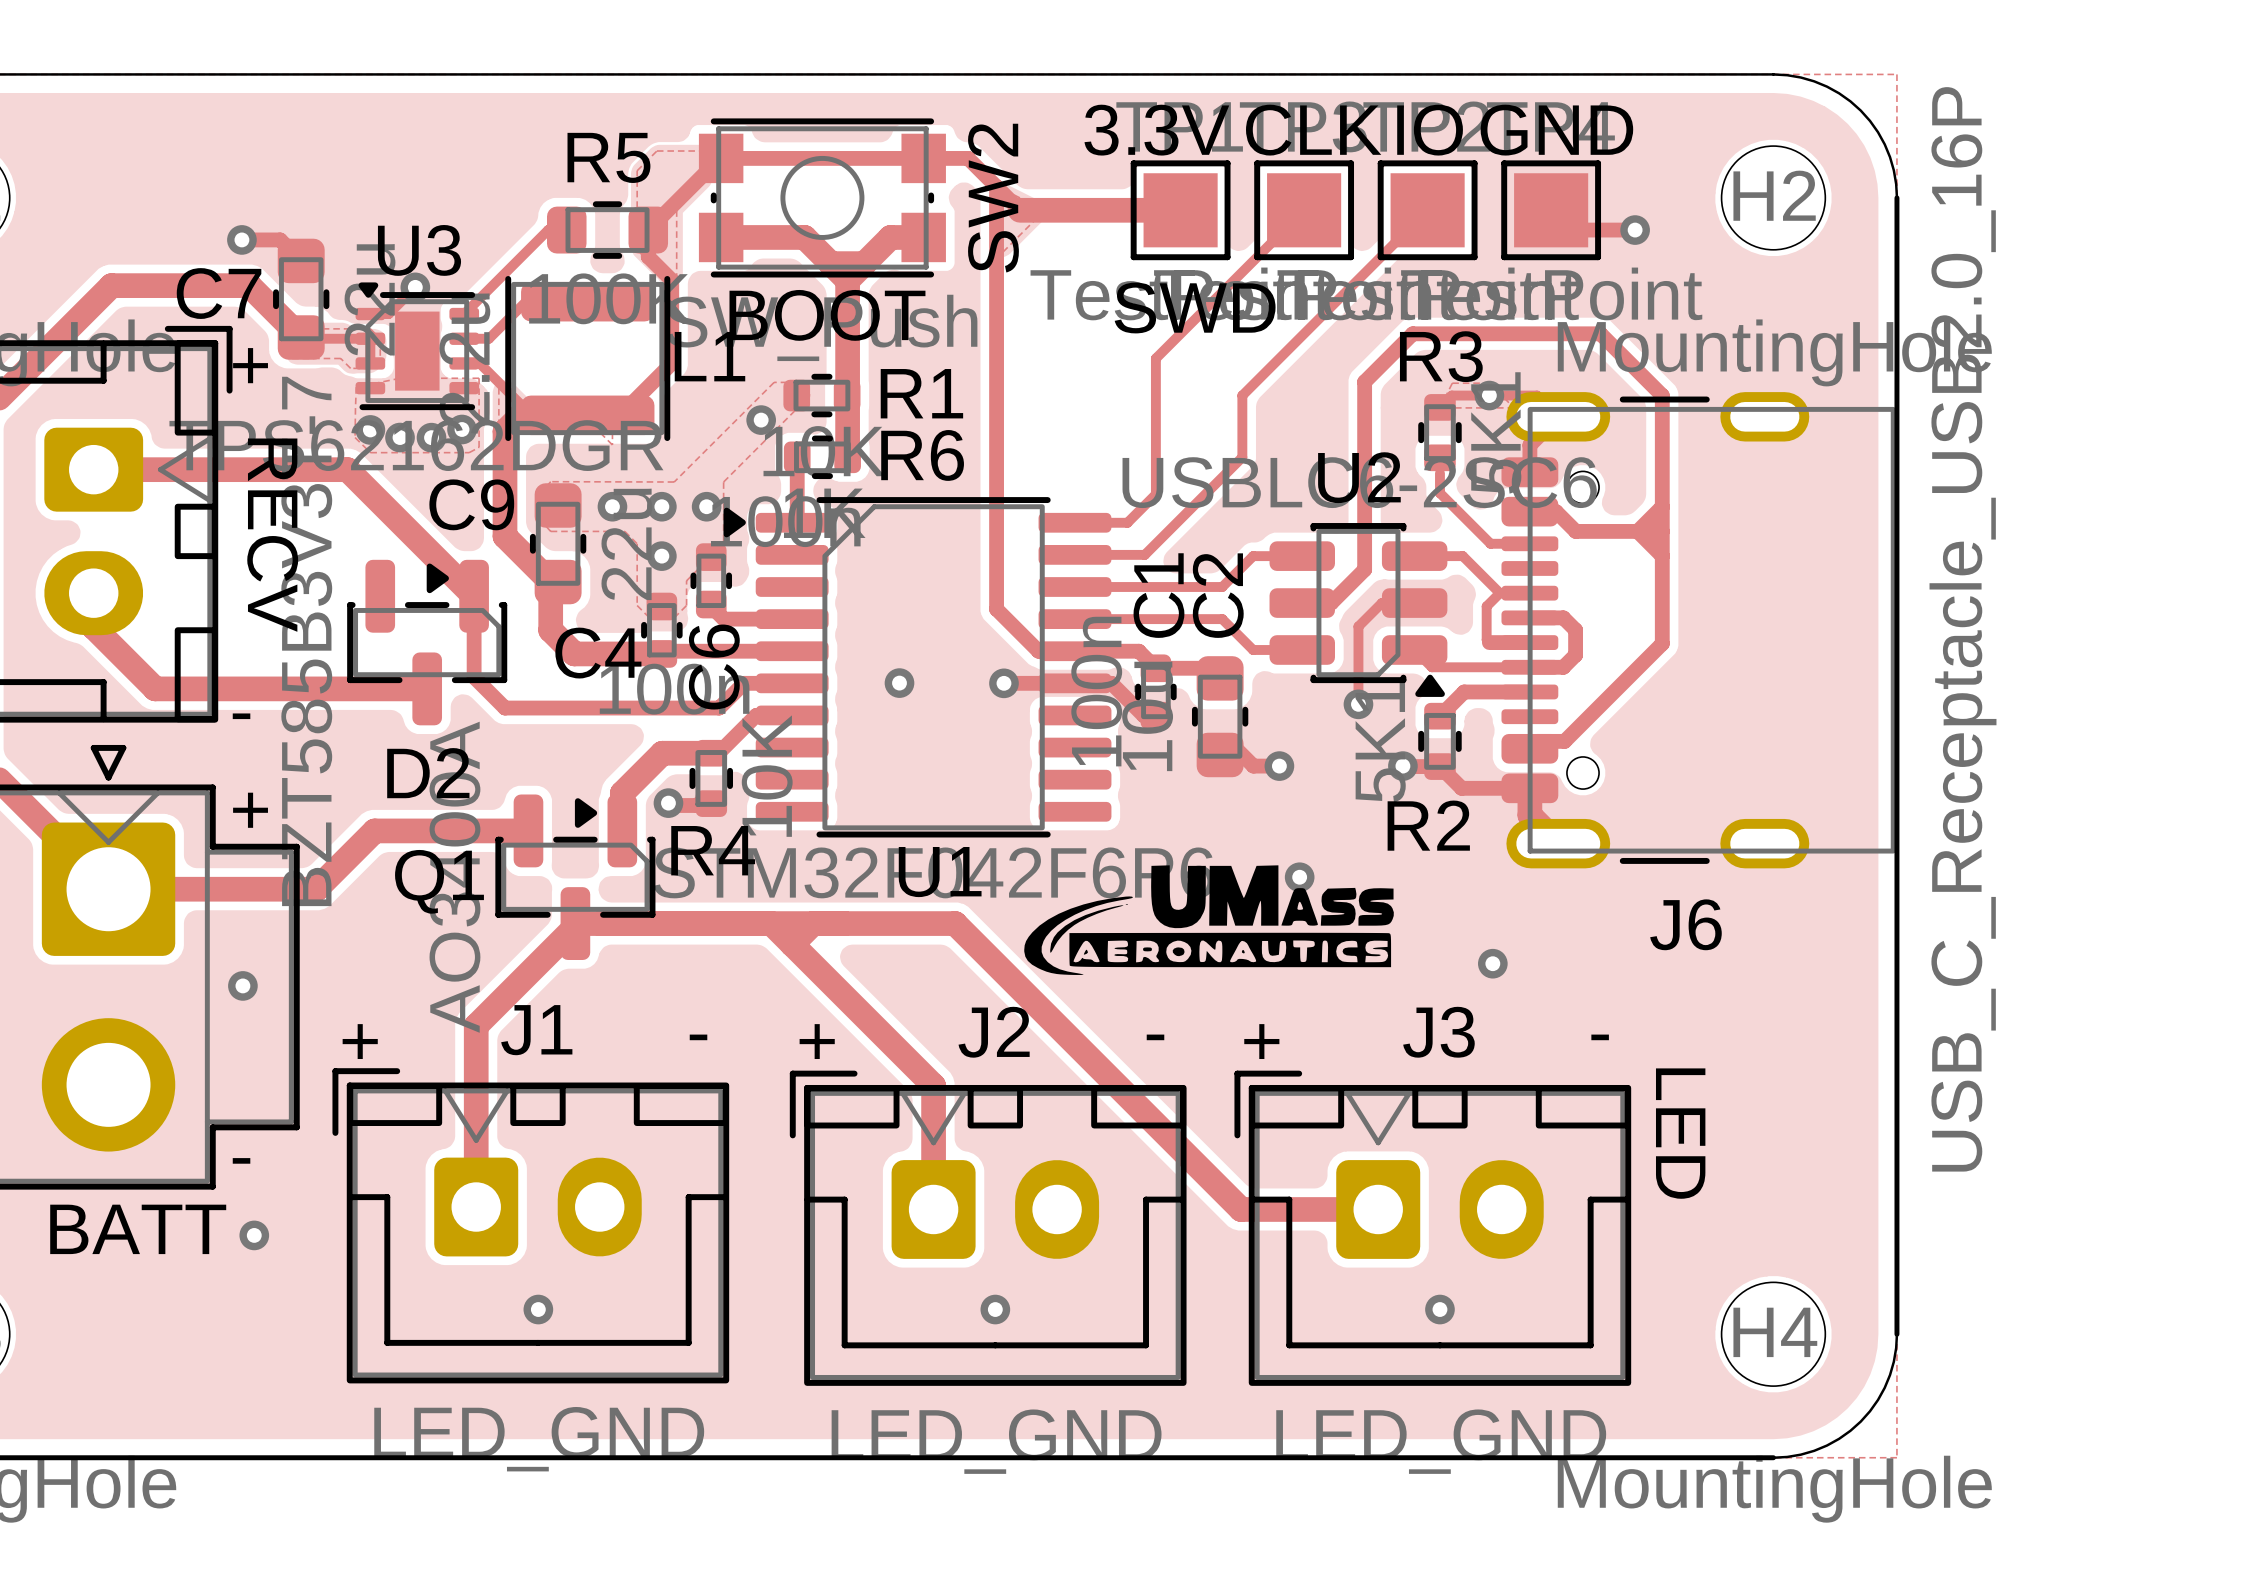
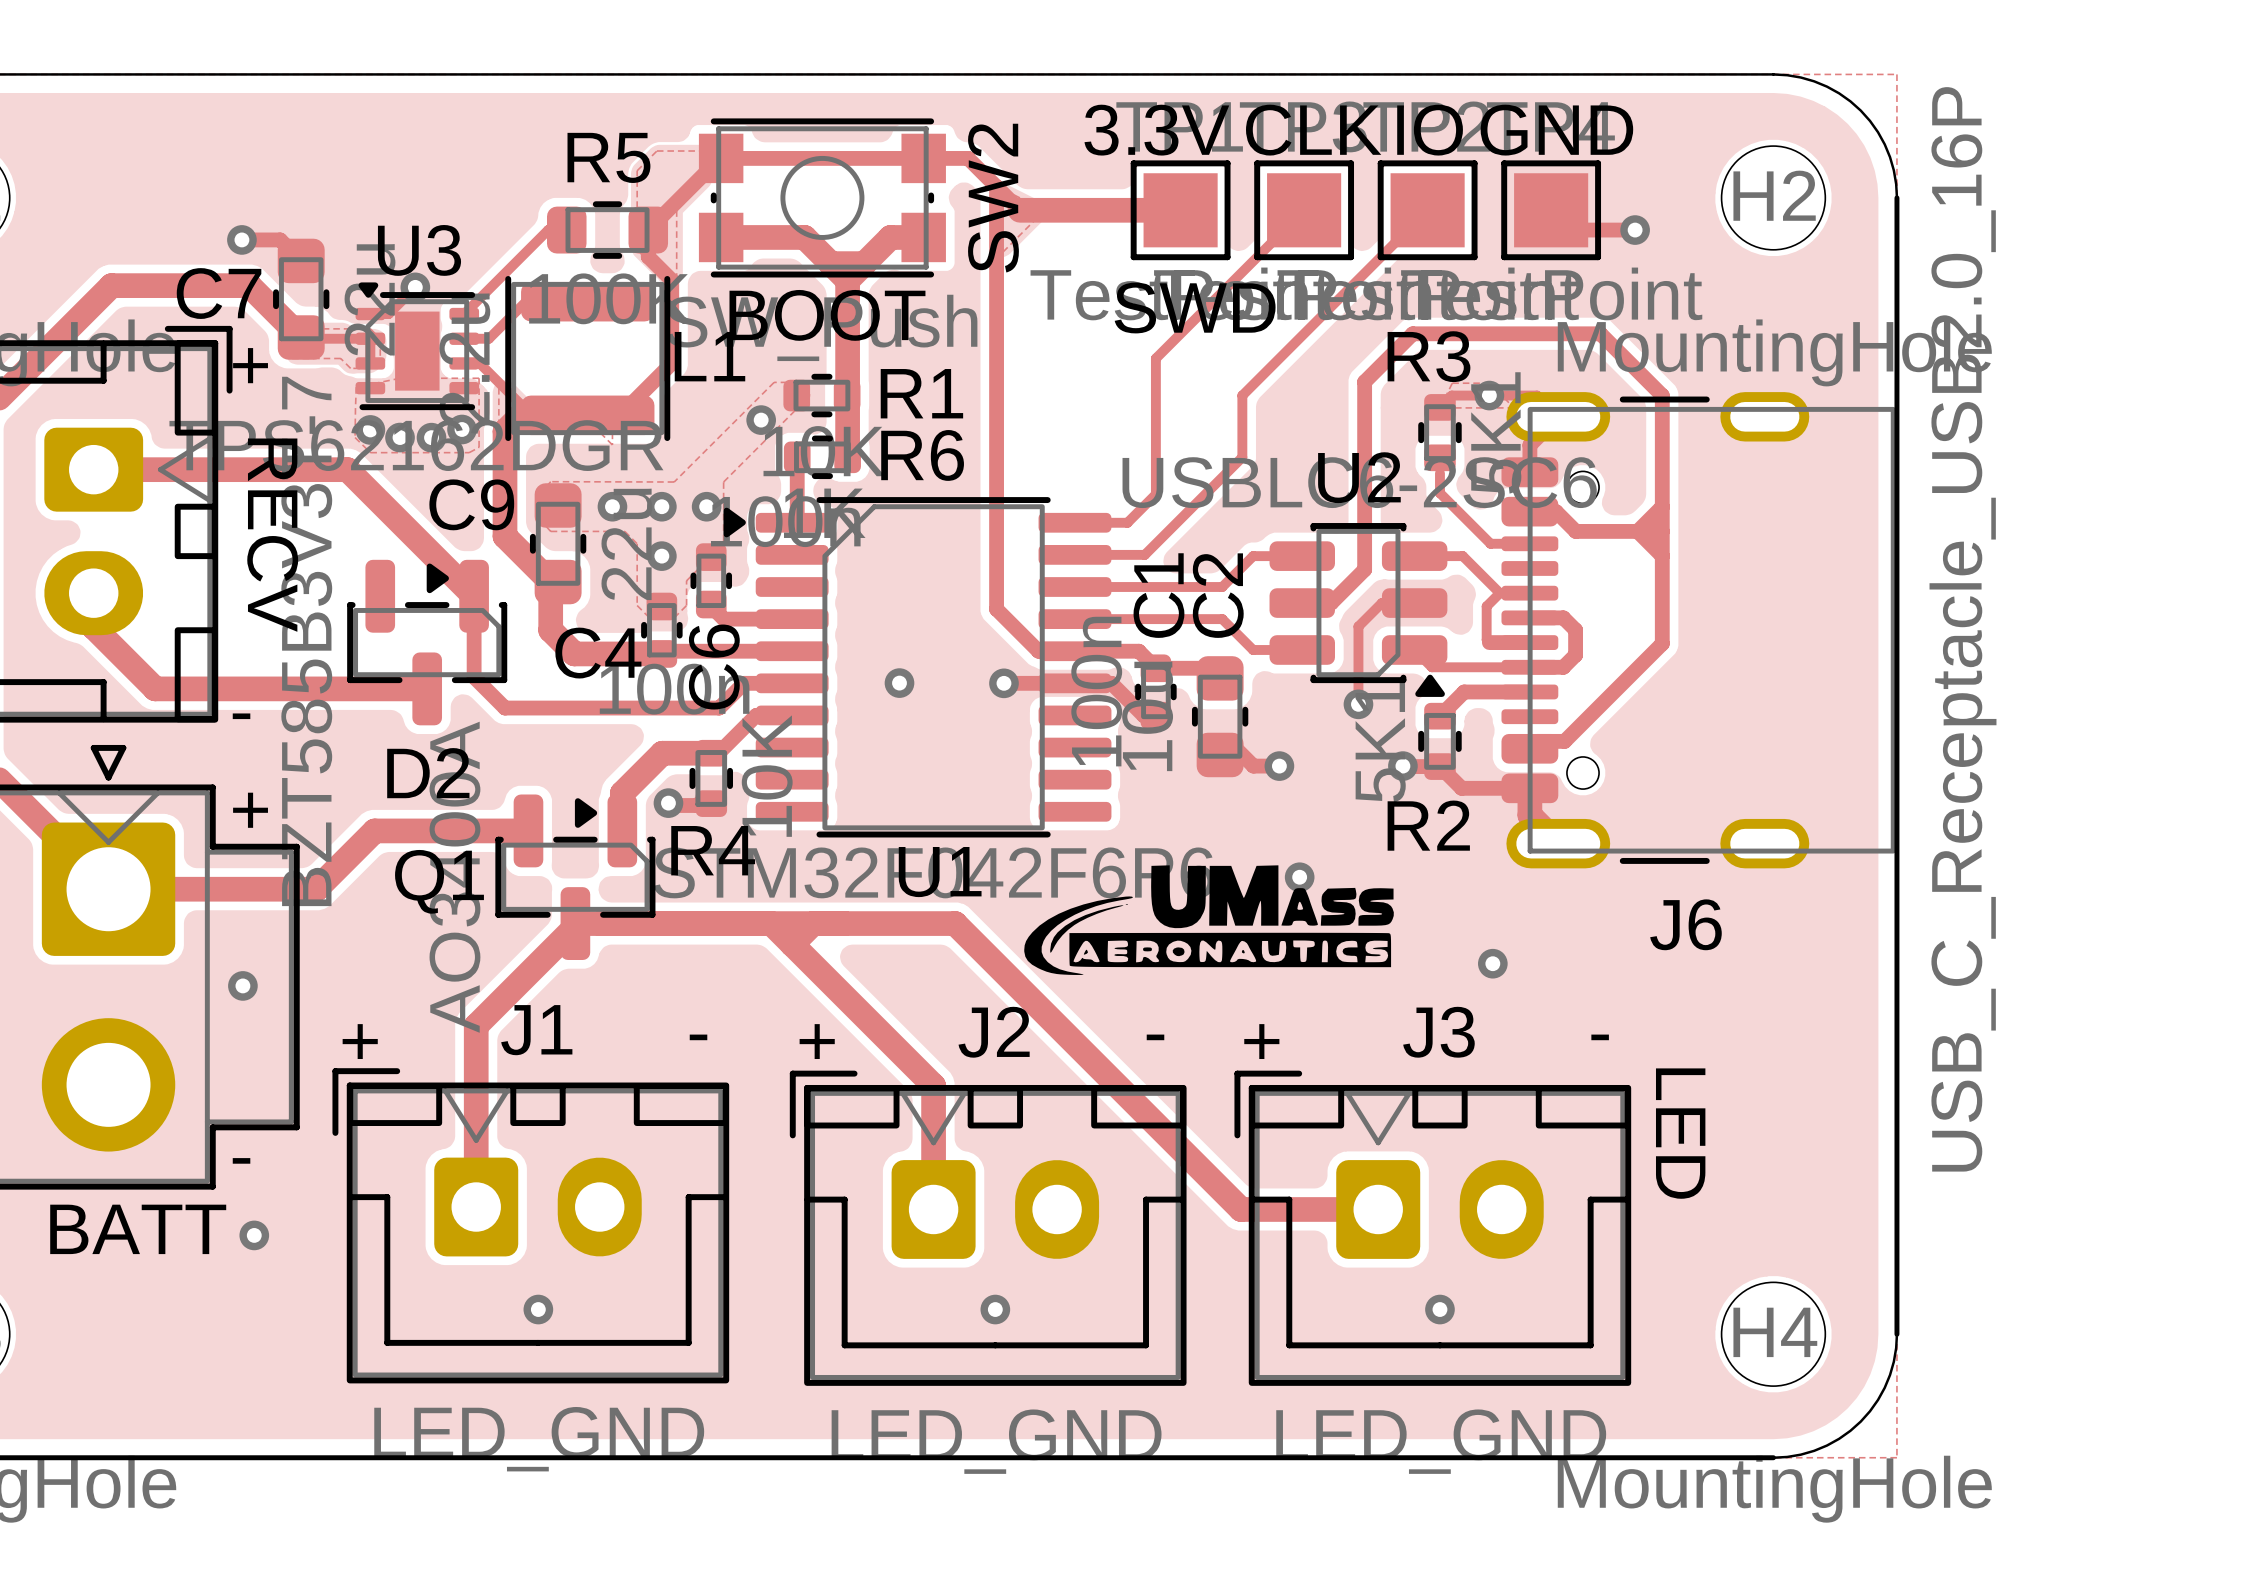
R3 name position: R3 (1441, 356) -> R3 (1428, 356)

